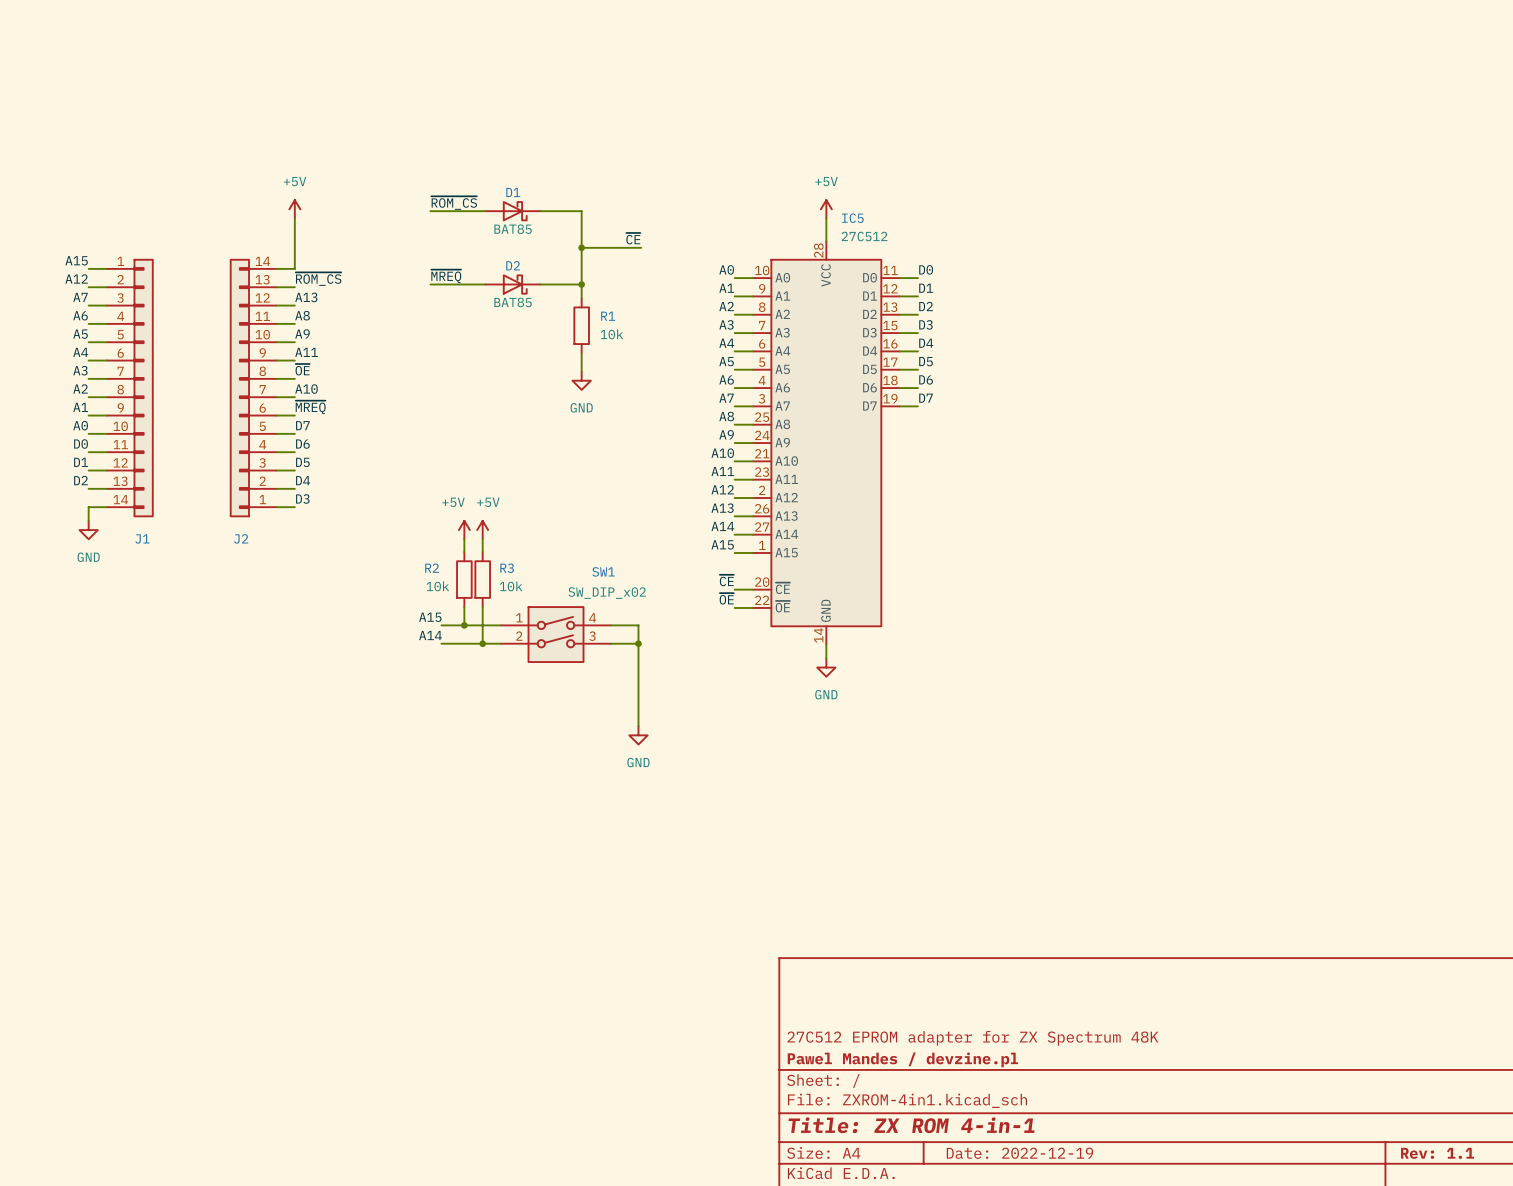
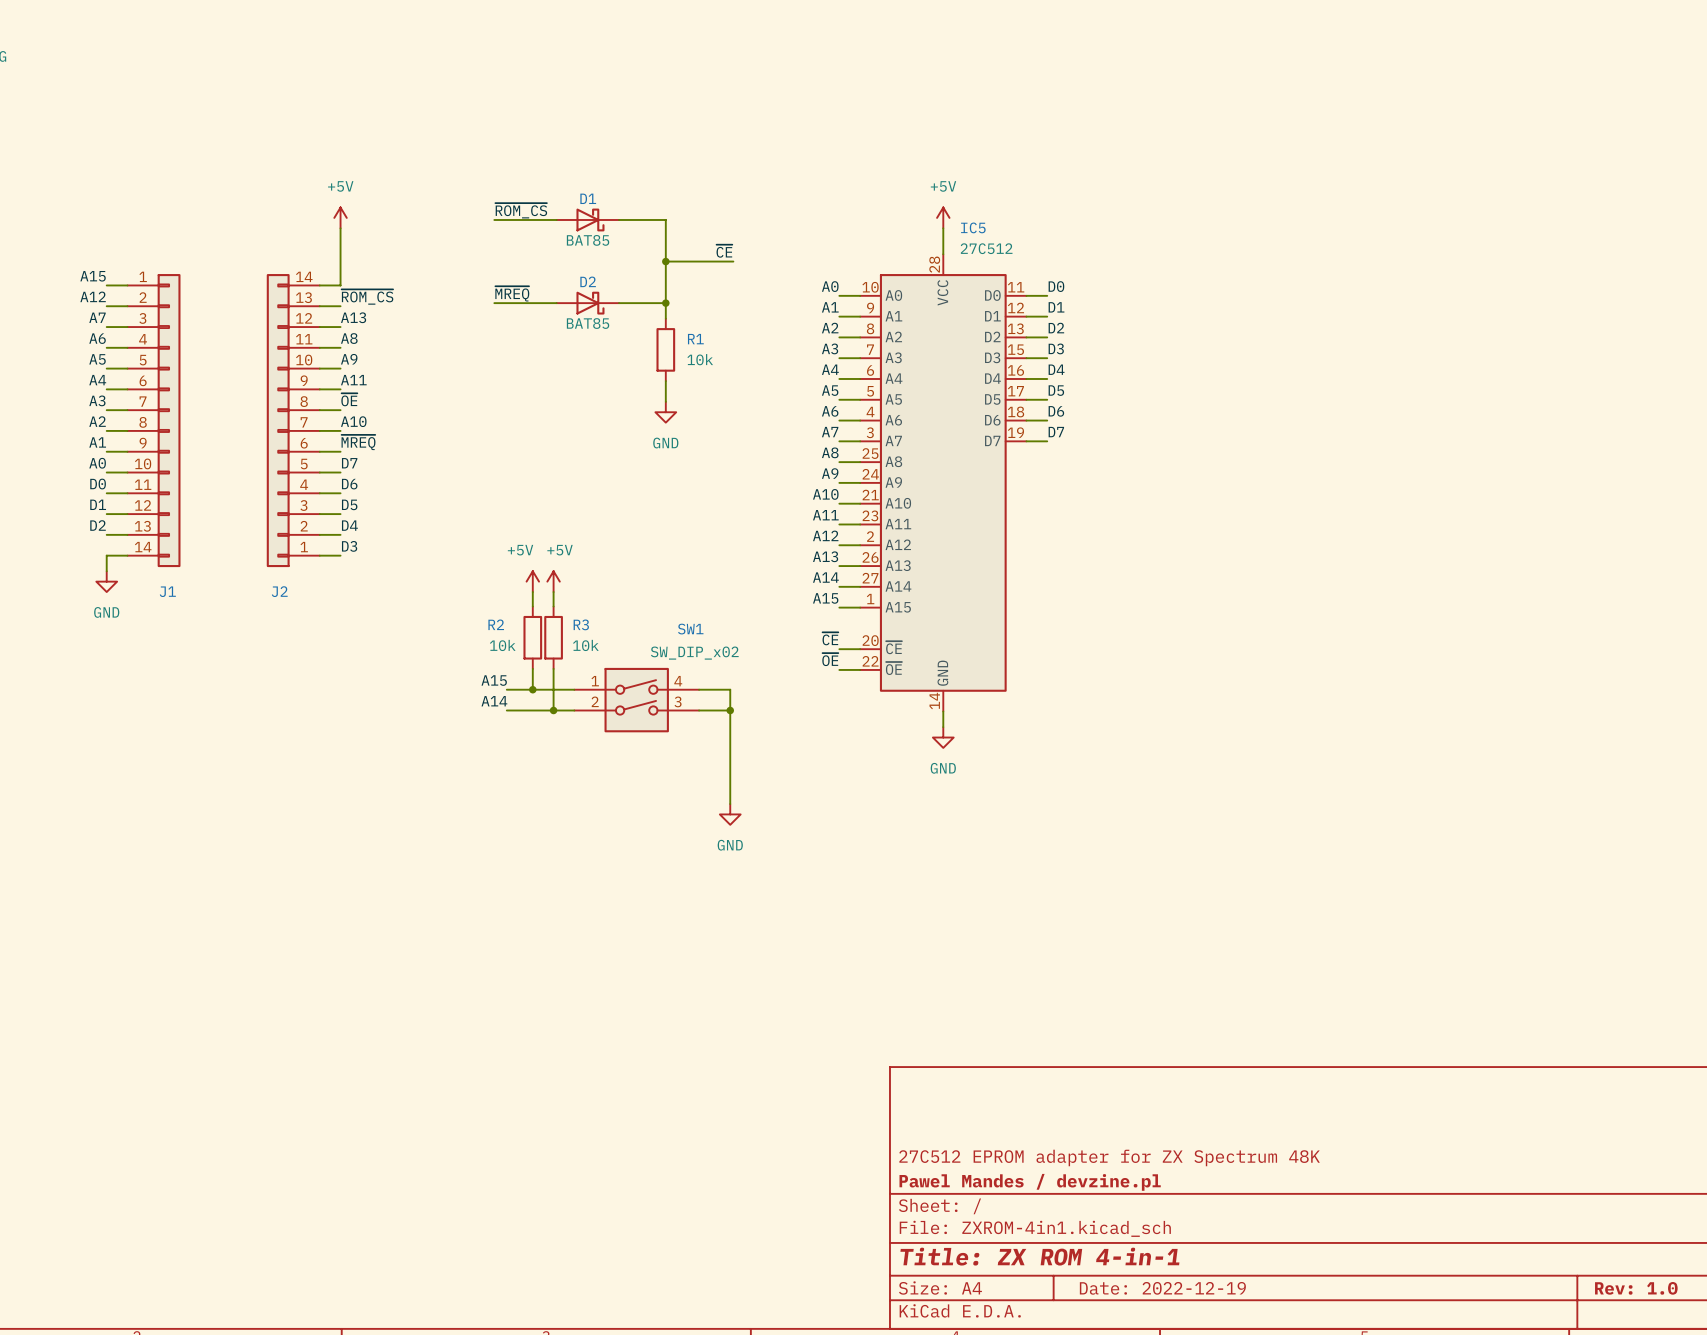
title block: Rev: 1.1 (1437, 1153) -> Rev: 1.0 (1636, 1288)

